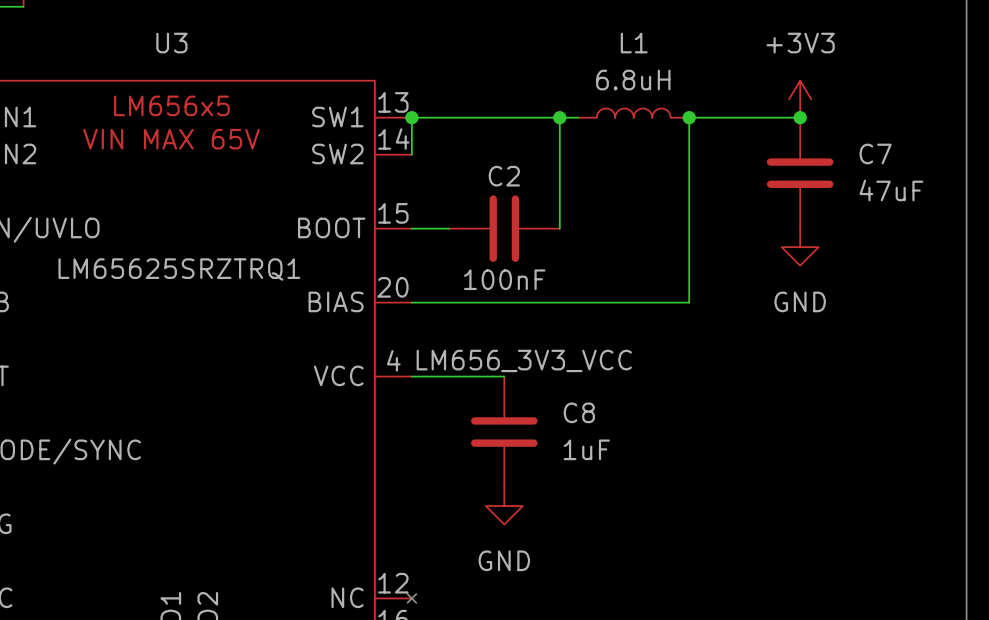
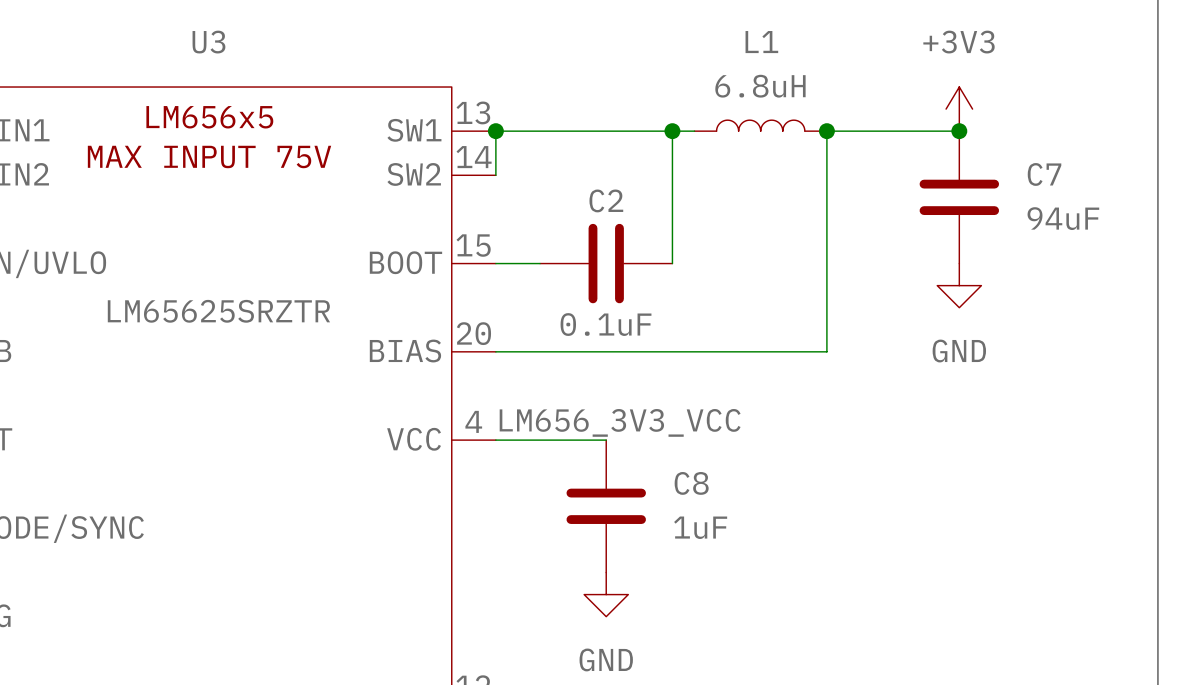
U3 text: VIN MAX 65V (171, 139) -> MAX INPUT 75V (209, 157)
C7 value: 47uF (891, 190) -> 94uF (1063, 218)
U3 value: LM65625SRZTRQ1 (179, 269) -> LM65625SRZTR (218, 311)
C2 value: 100nF (504, 279) -> 0.1uF (606, 324)

